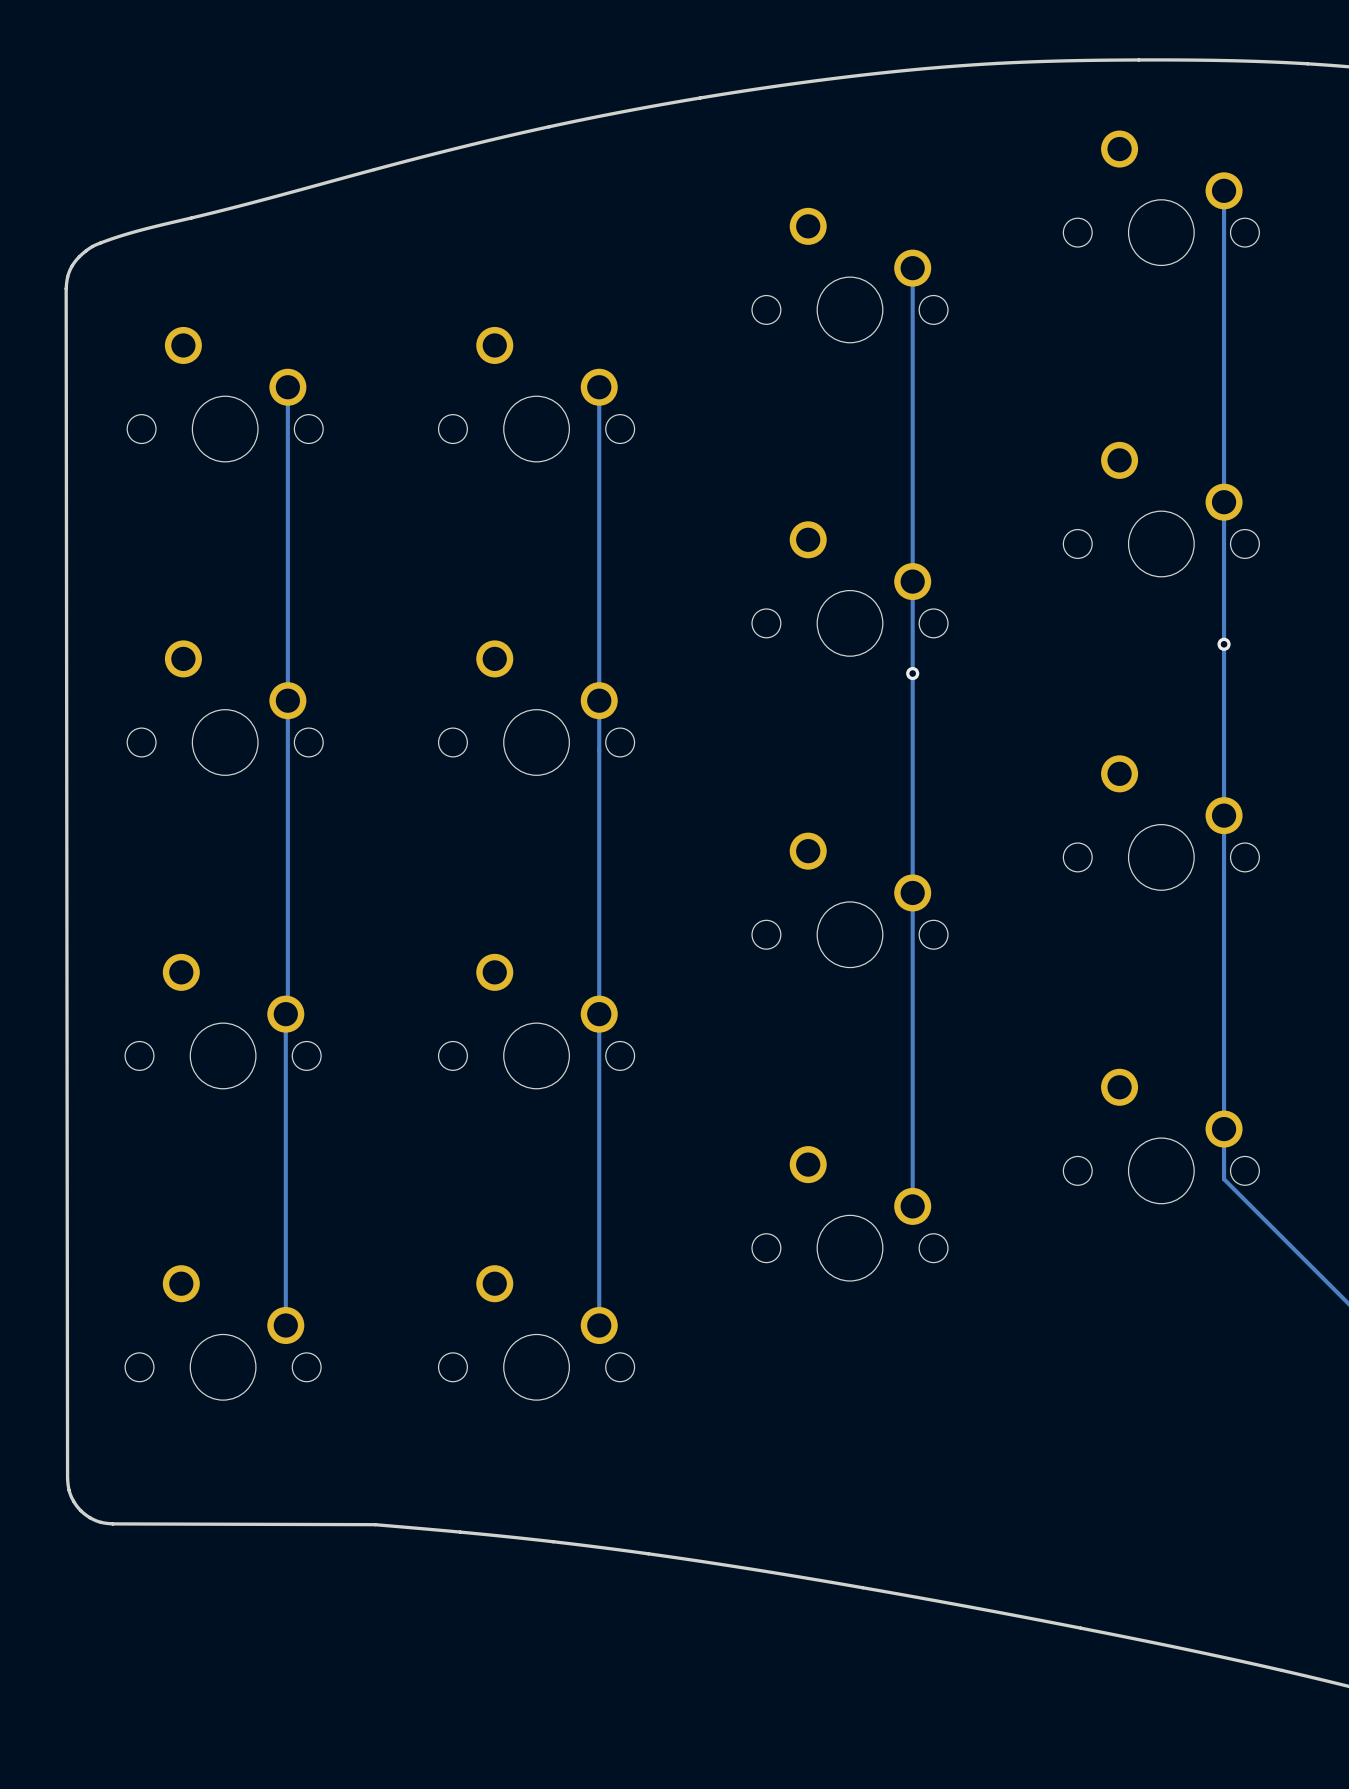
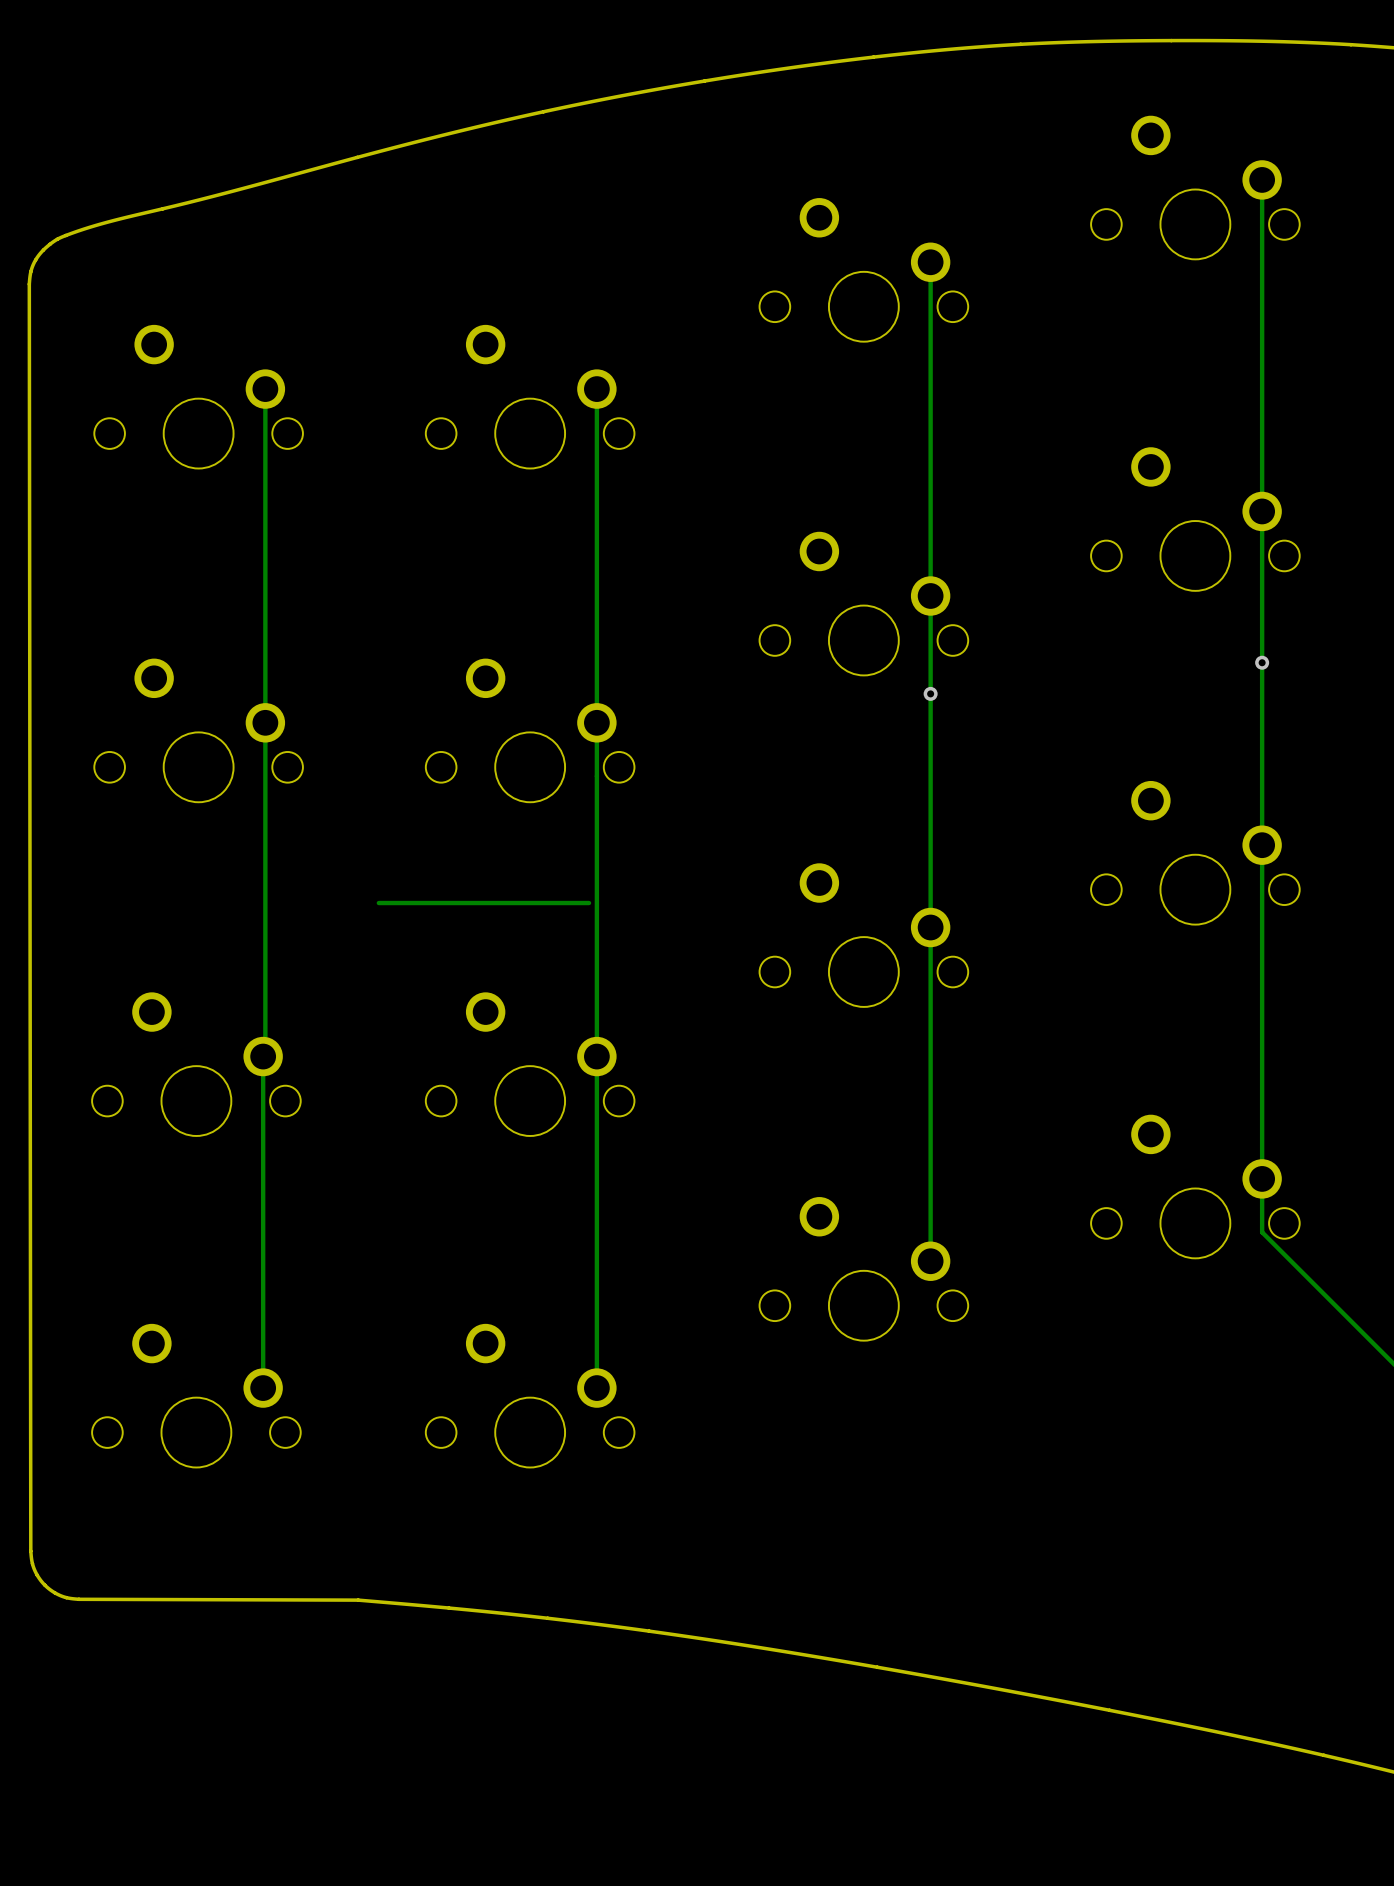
track: none -> (589, 903) (378, 903)

